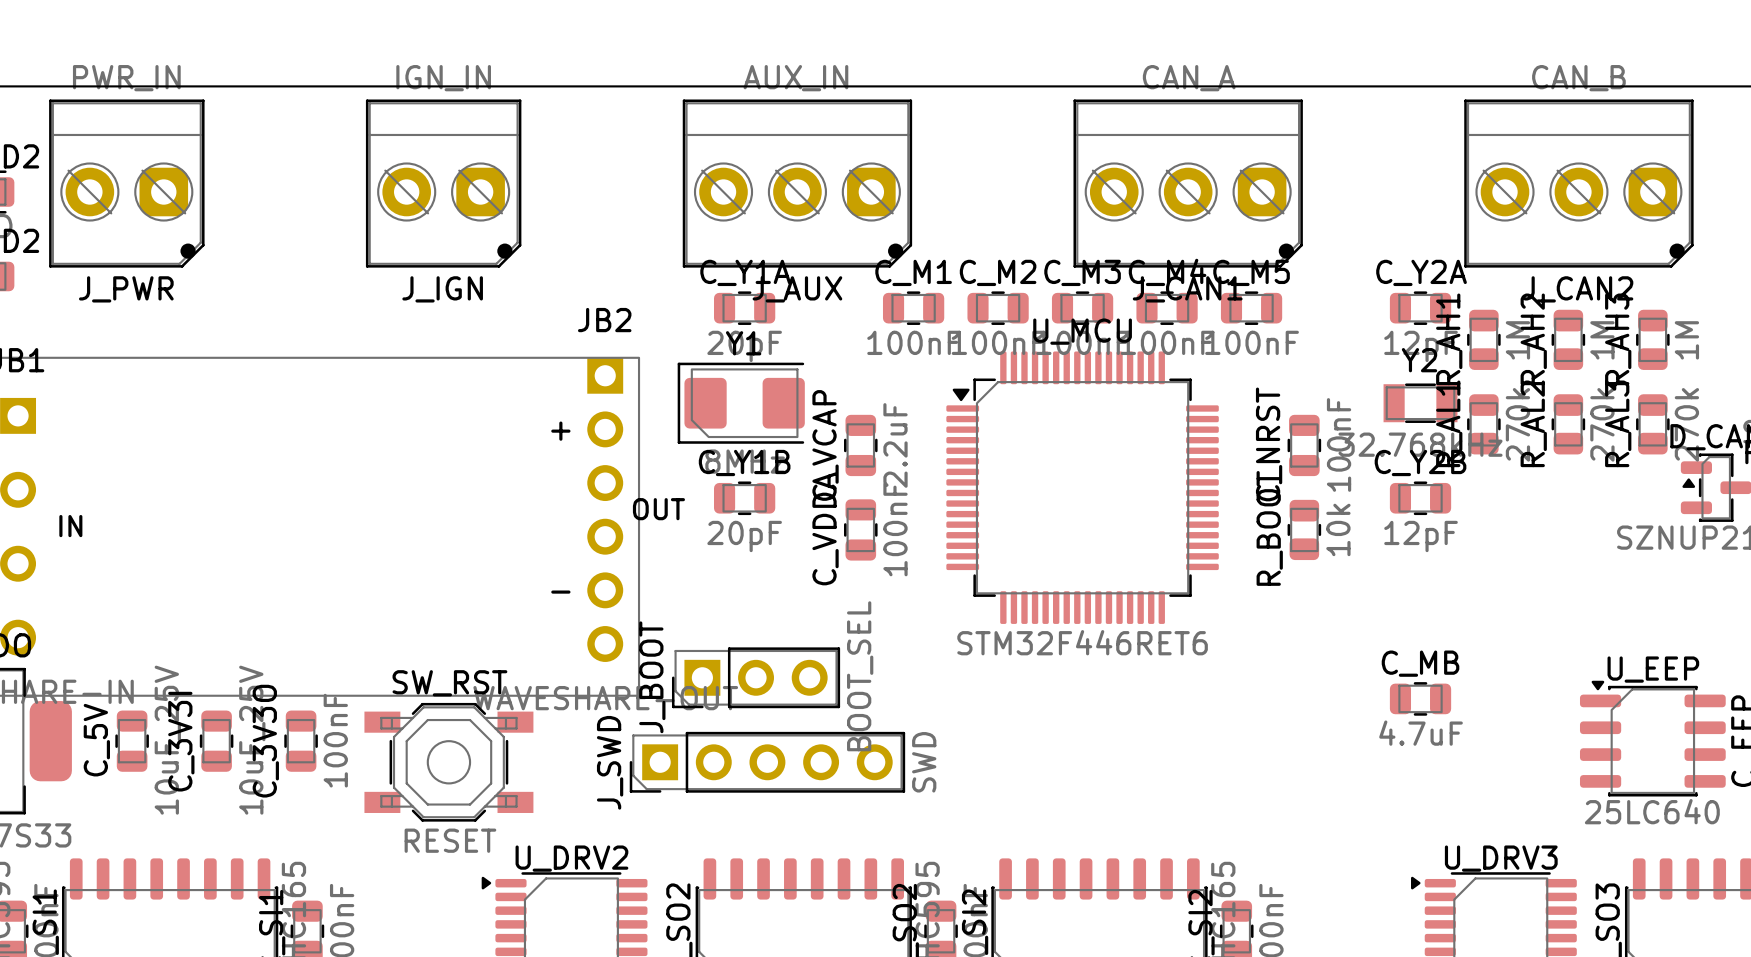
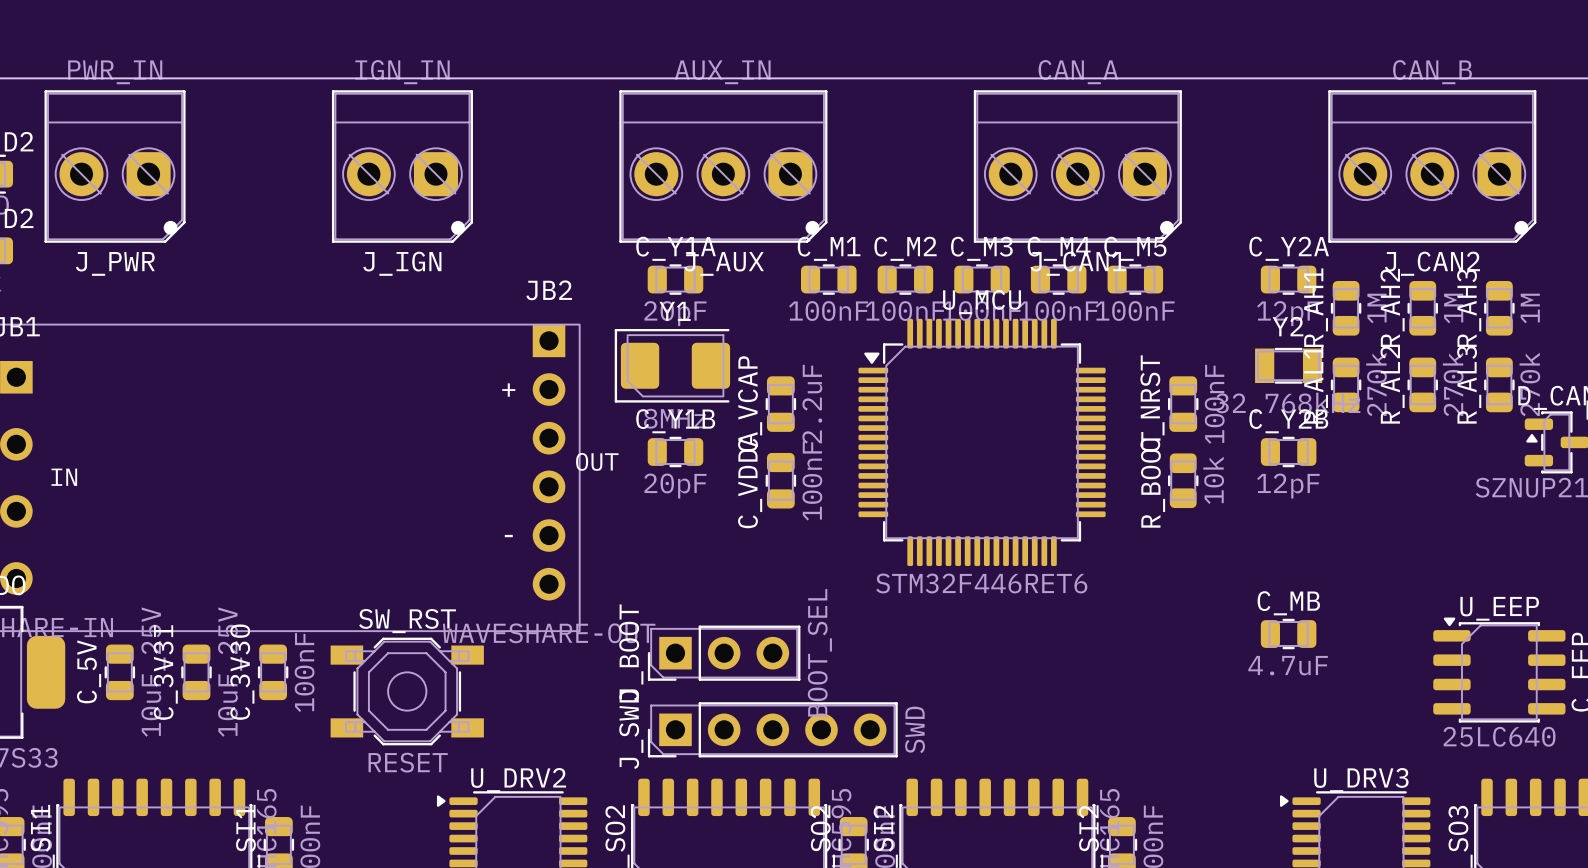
J_BOOT position: (756, 677) -> (724, 653)
J_SWD position: (767, 762) -> (772, 729)

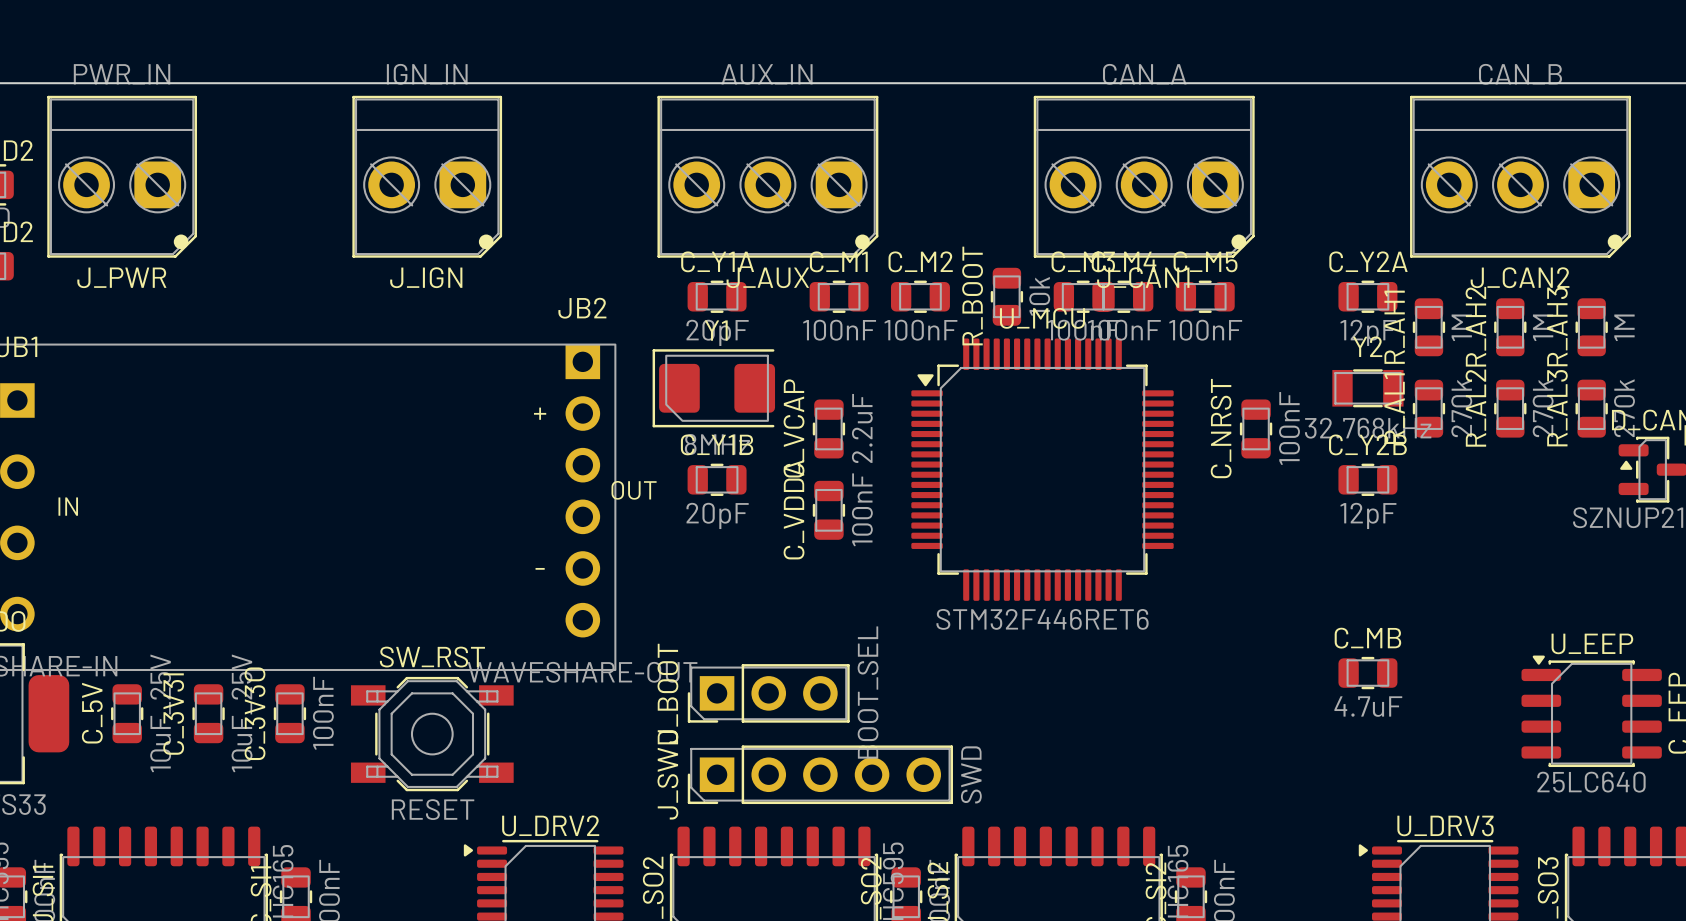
C_M1 position: (828, 279) -> (839, 296)
C_M2 position: (905, 279) -> (920, 296)
C_M3 position: (982, 279) -> (1083, 296)
R_BOOT position: (1183, 480) -> (1006, 296)

